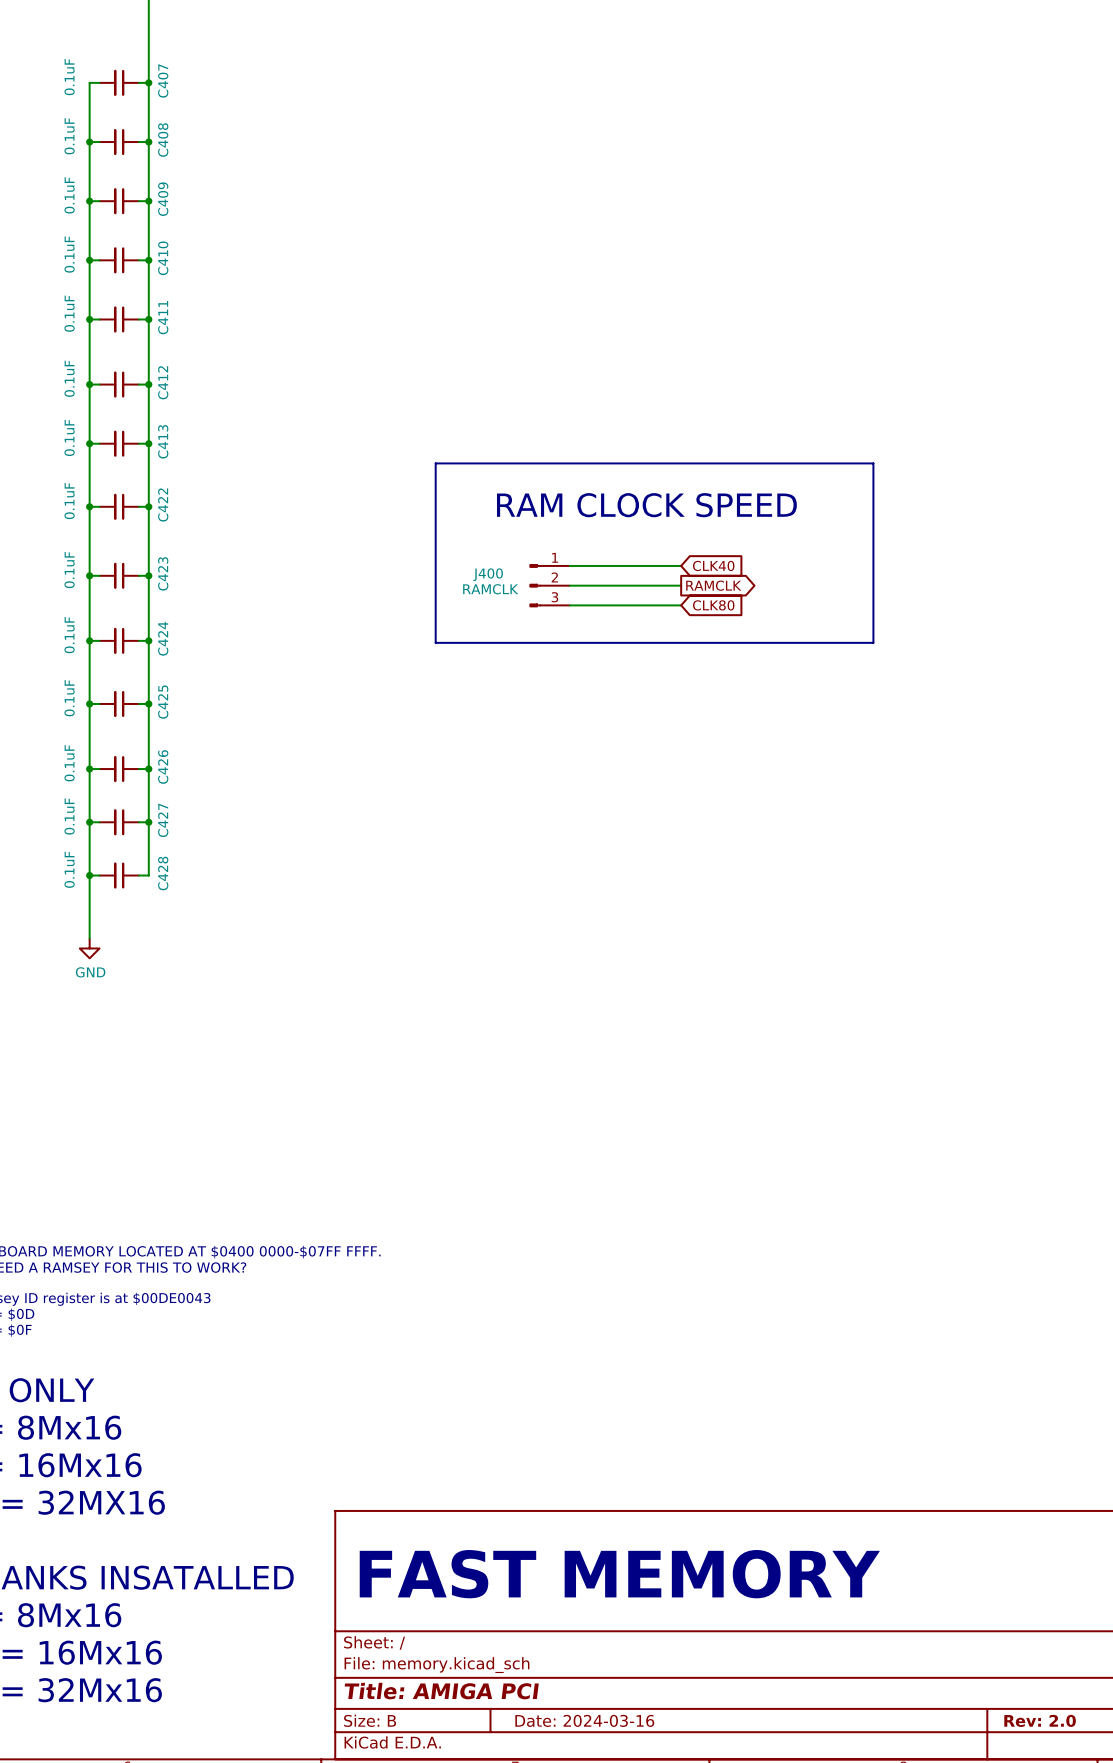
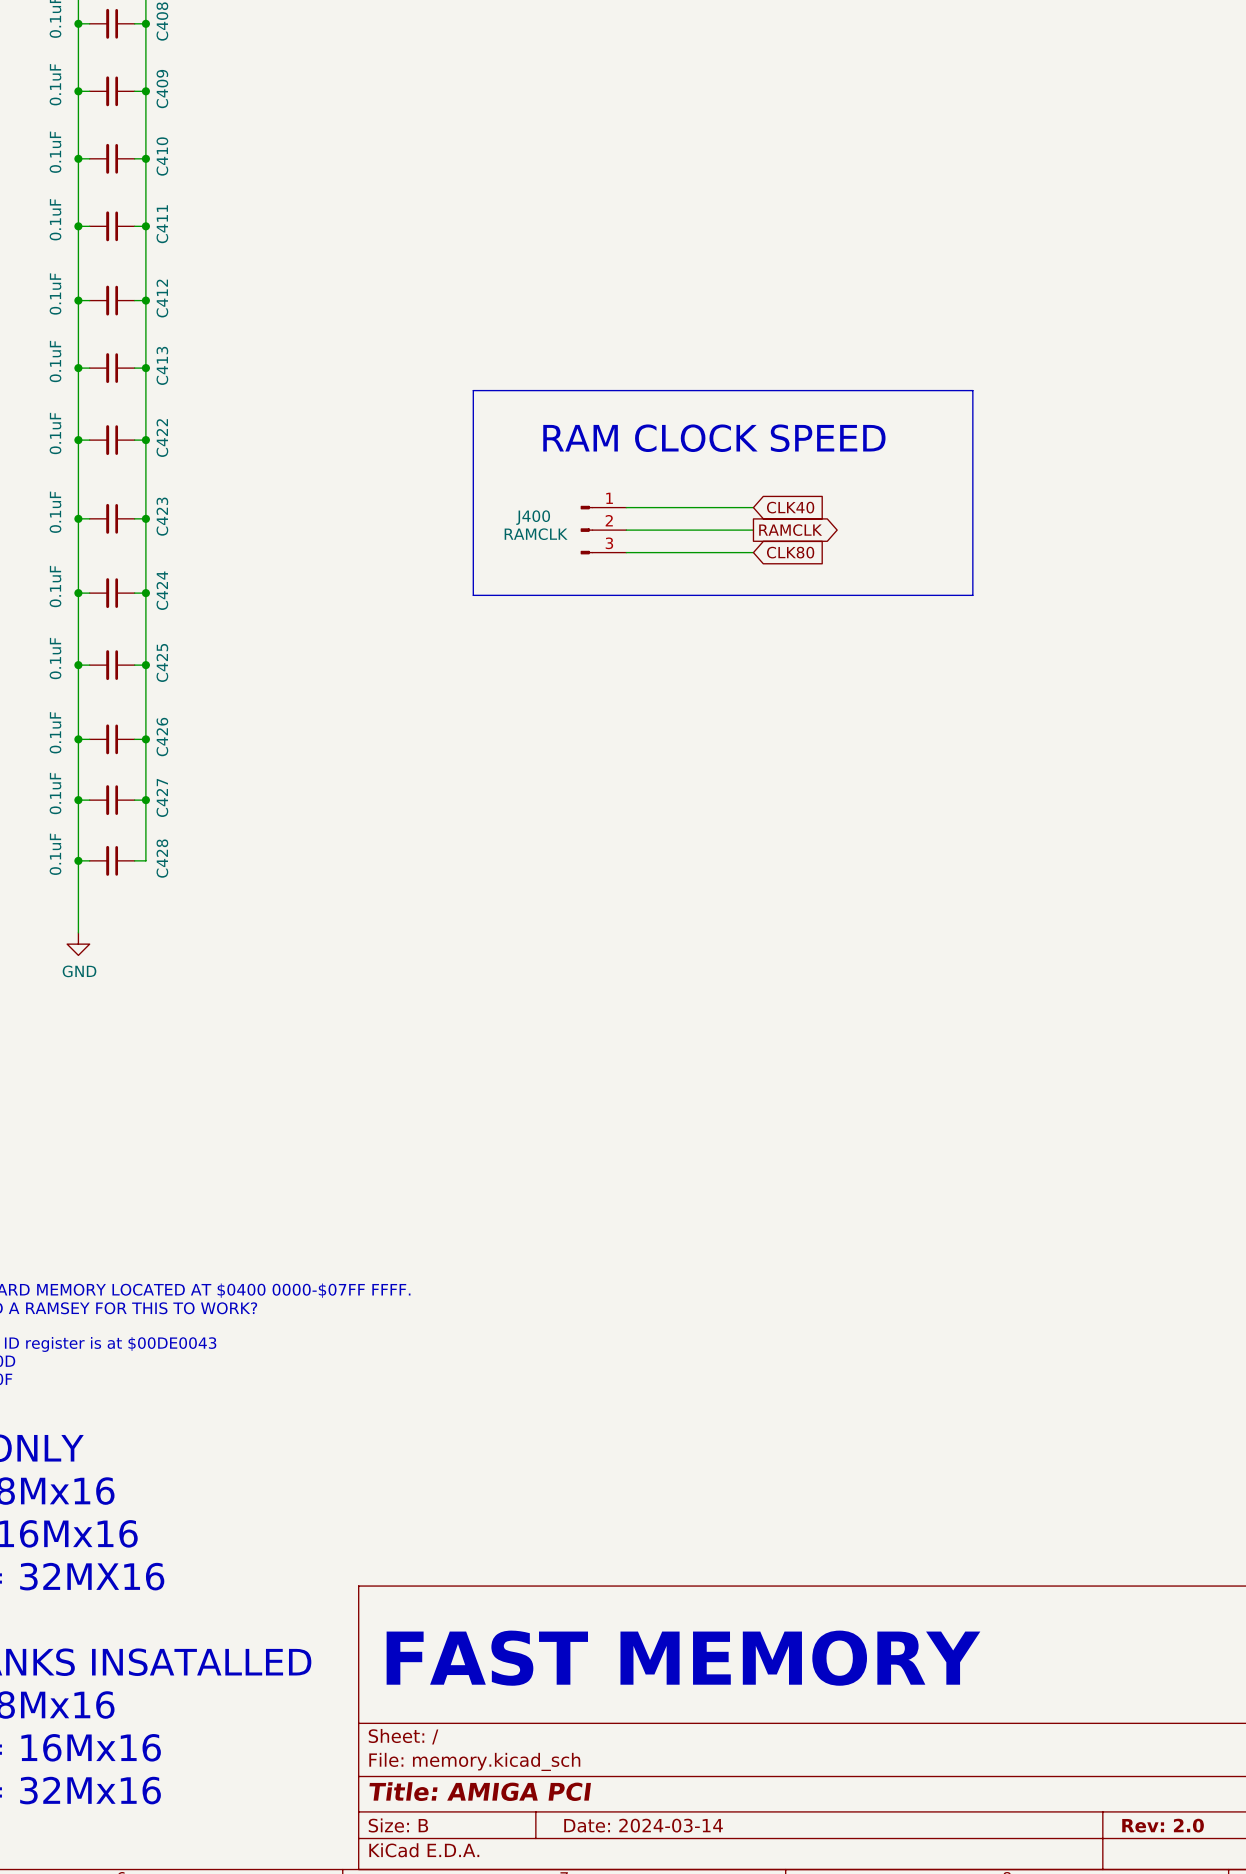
title block: Date: 2024-03-16 (584, 1720) -> Date: 2024-03-14 (643, 1825)

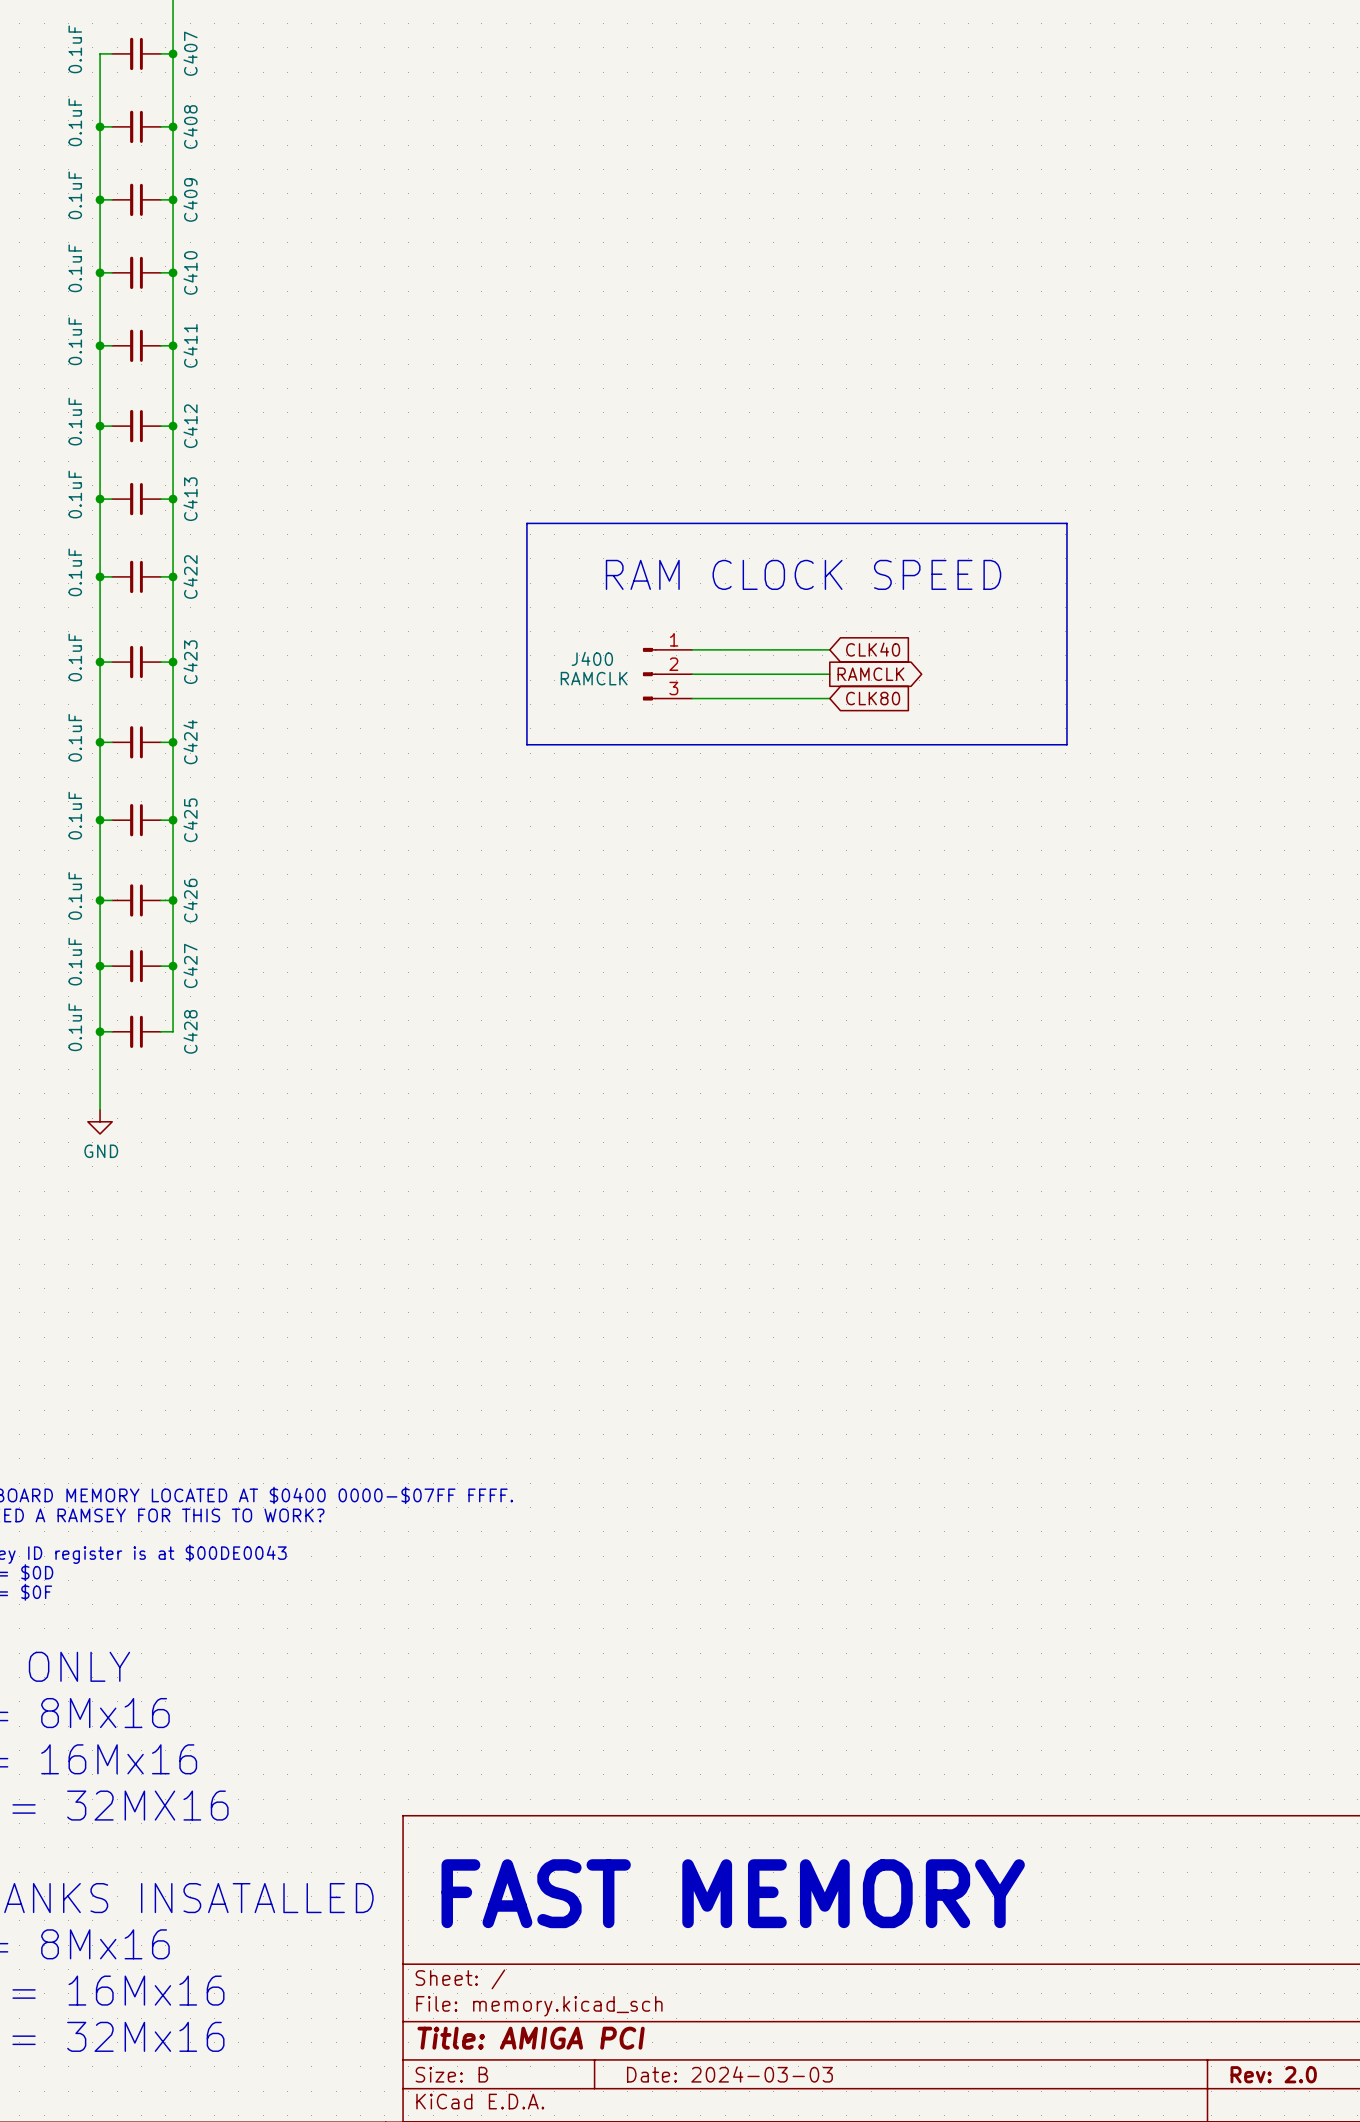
title block: Date: 2024-03-14 (643, 1825) -> Date: 2024-03-03 (729, 2074)

